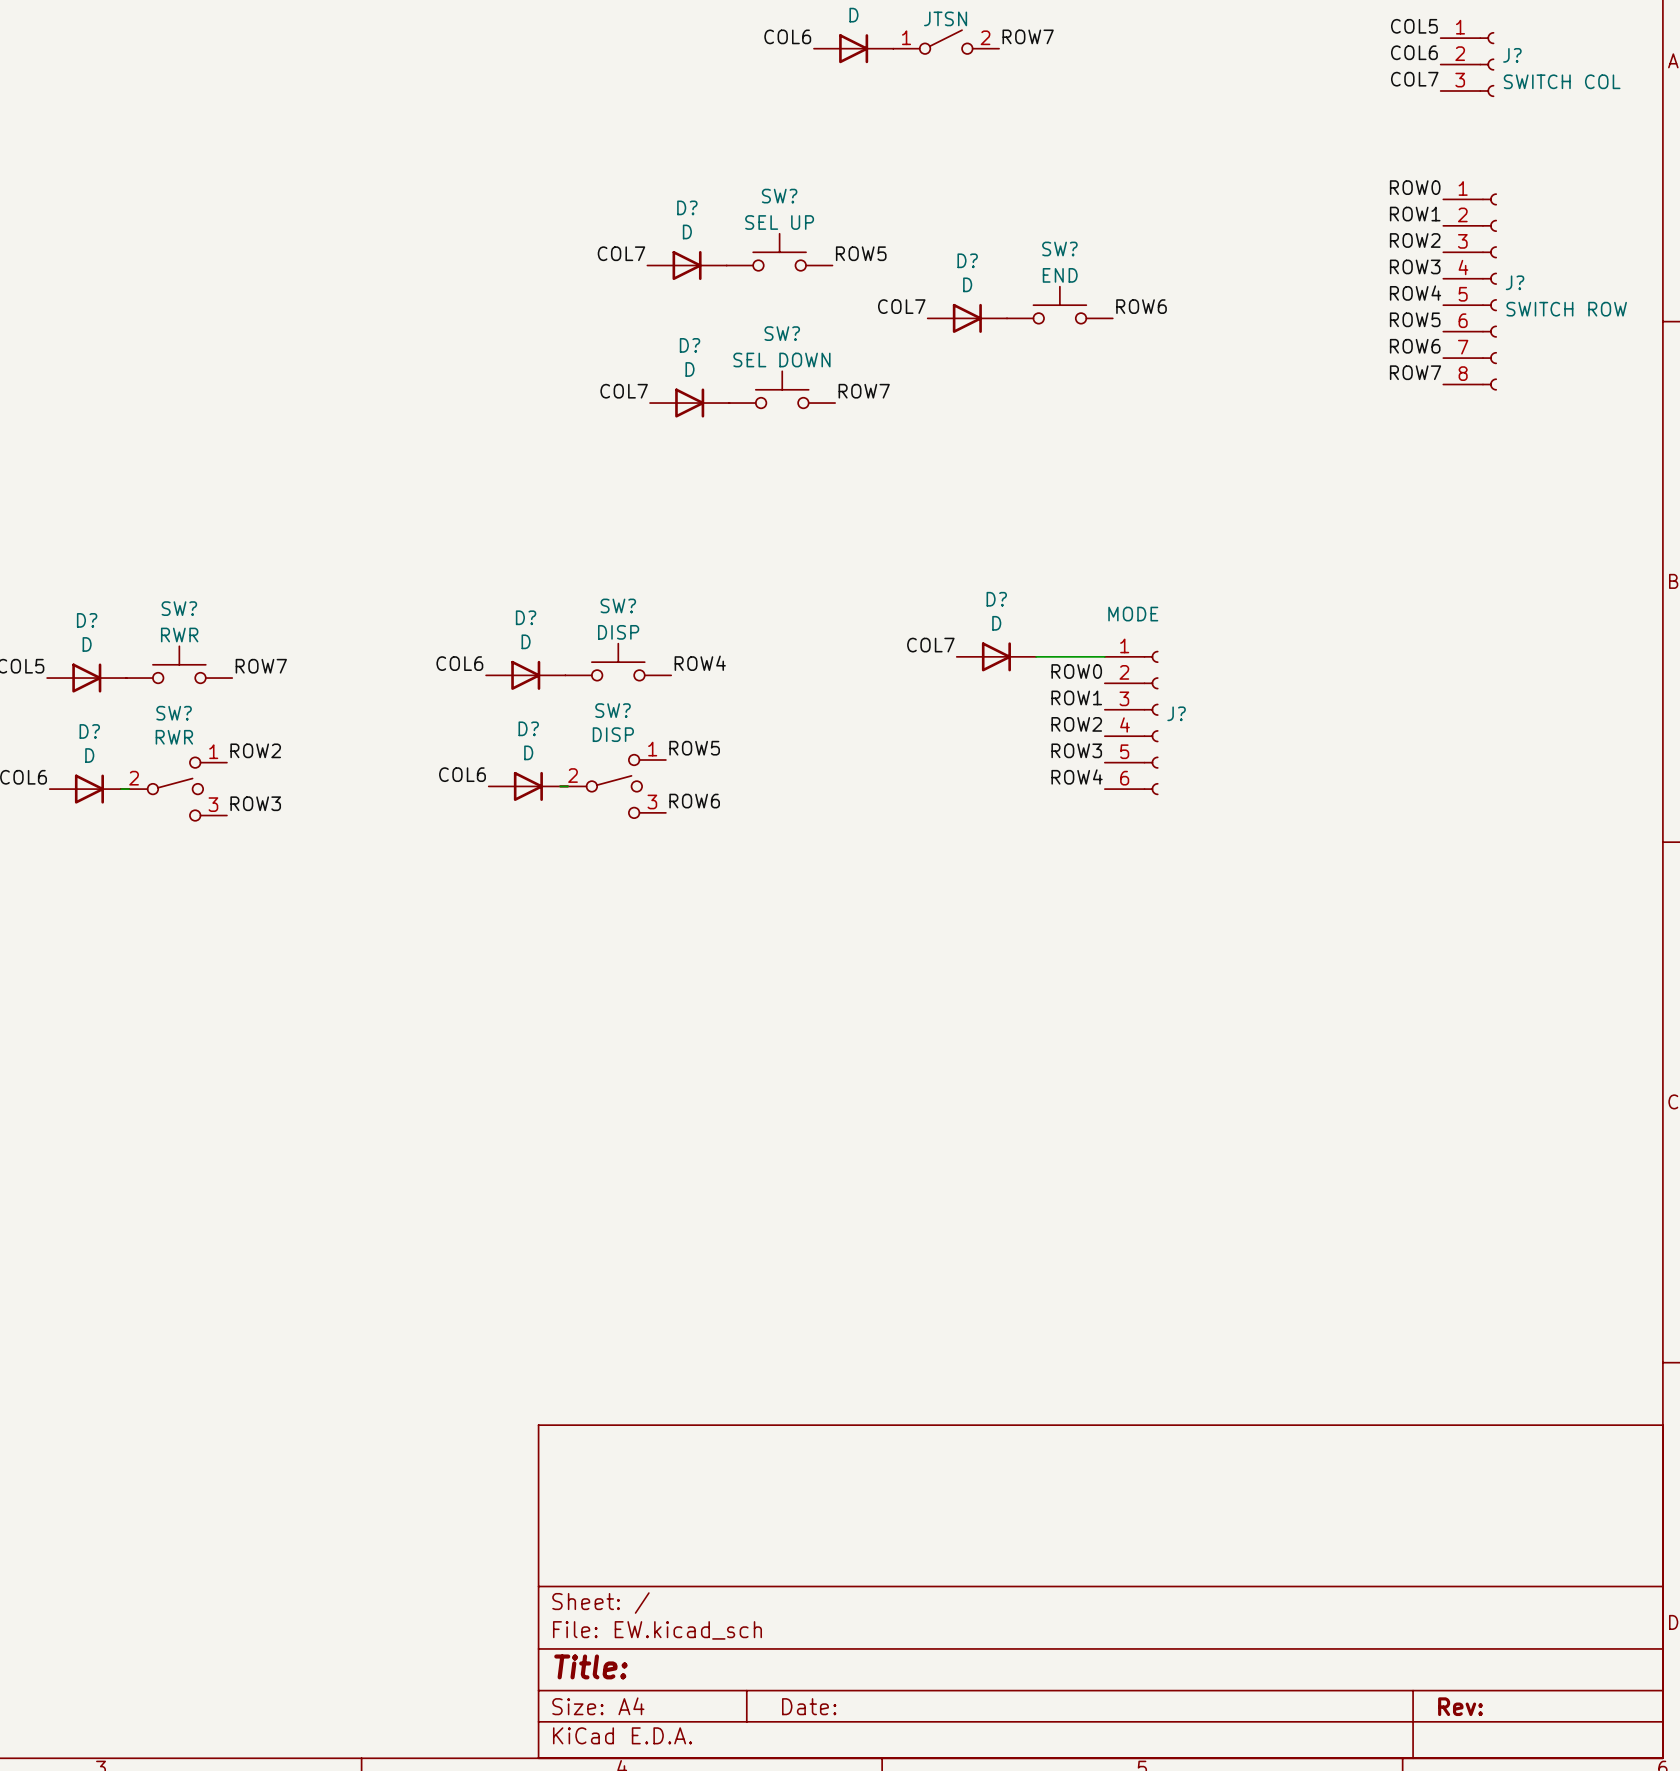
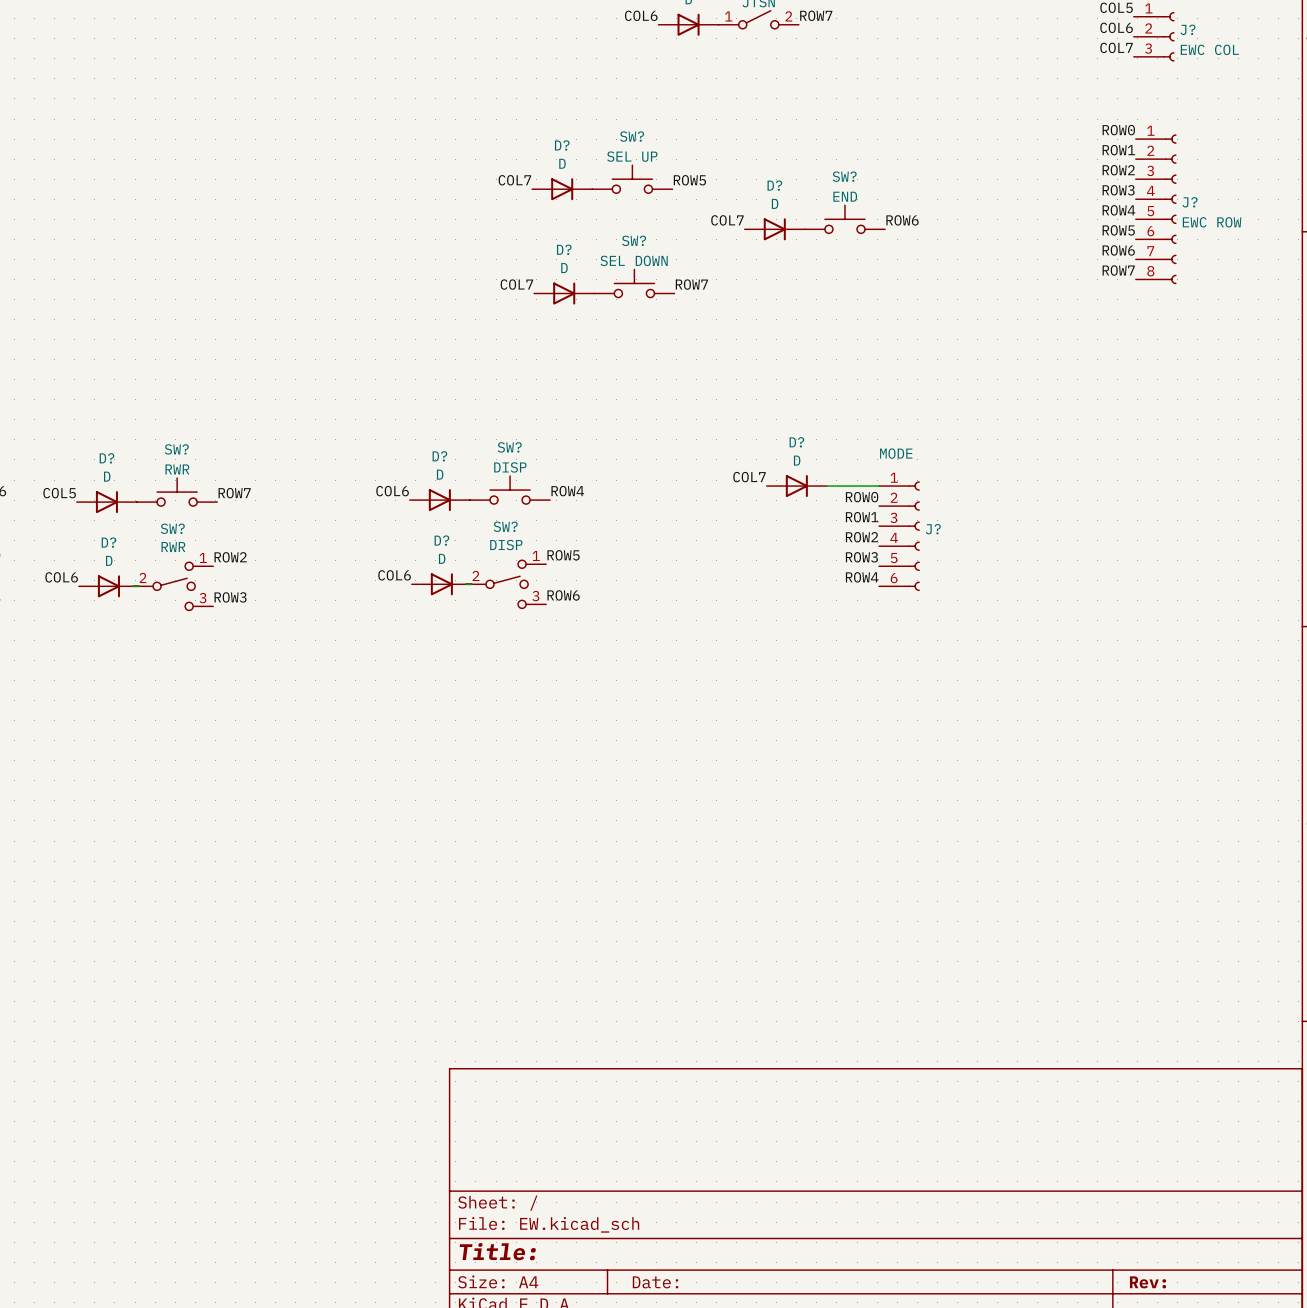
J? value: SWITCH COL (1562, 81) -> EWC COL (1209, 49)
J? value: SWITCH ROW (1566, 309) -> EWC ROW (1212, 222)

